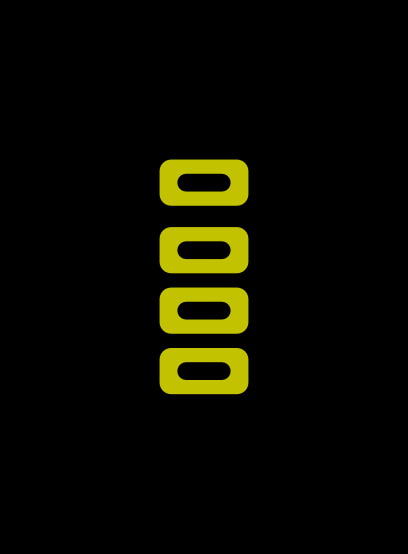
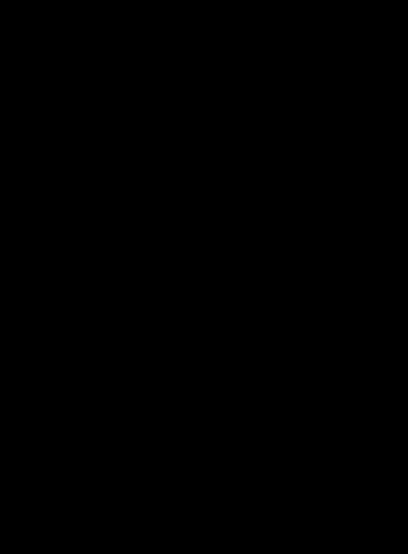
part: (203, 276) -> none

